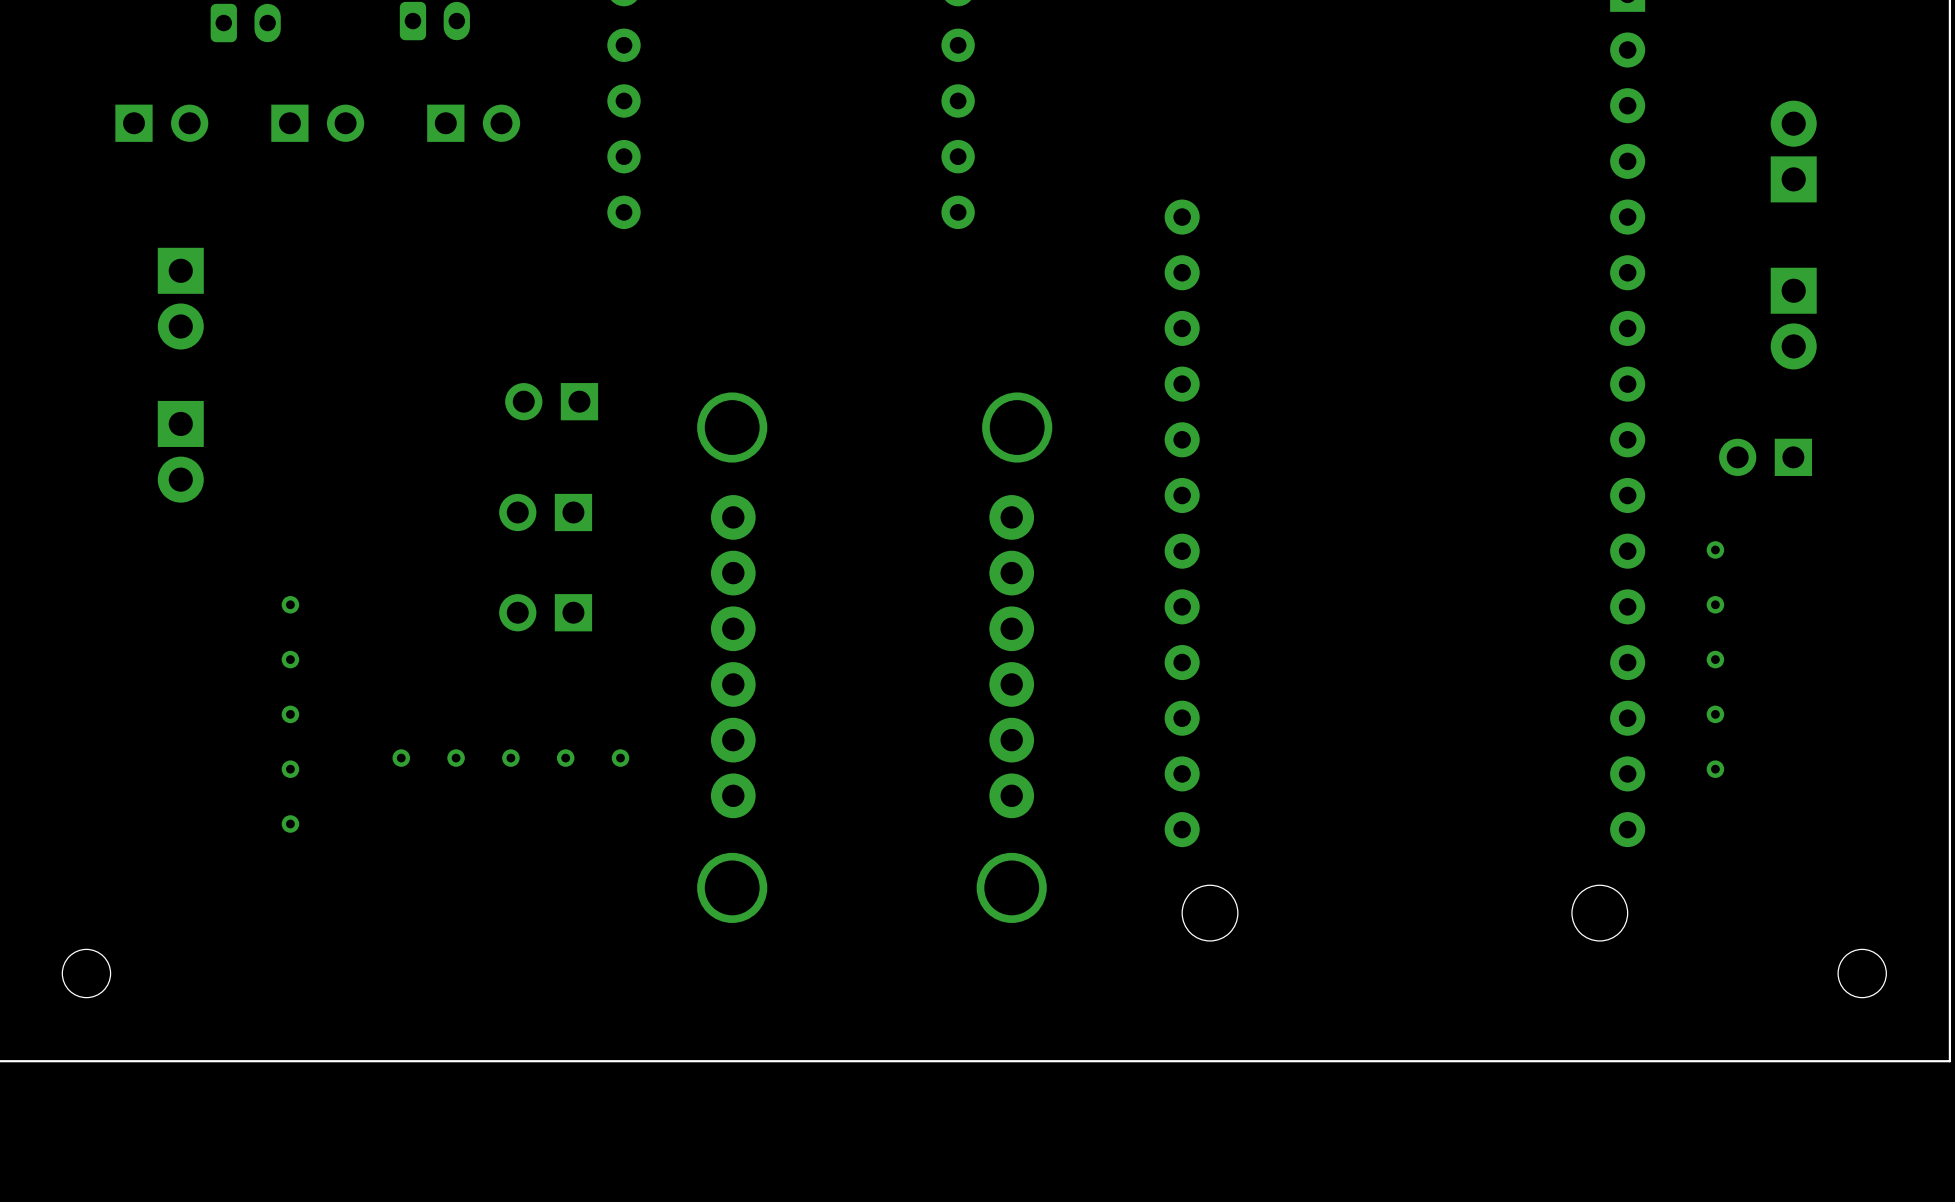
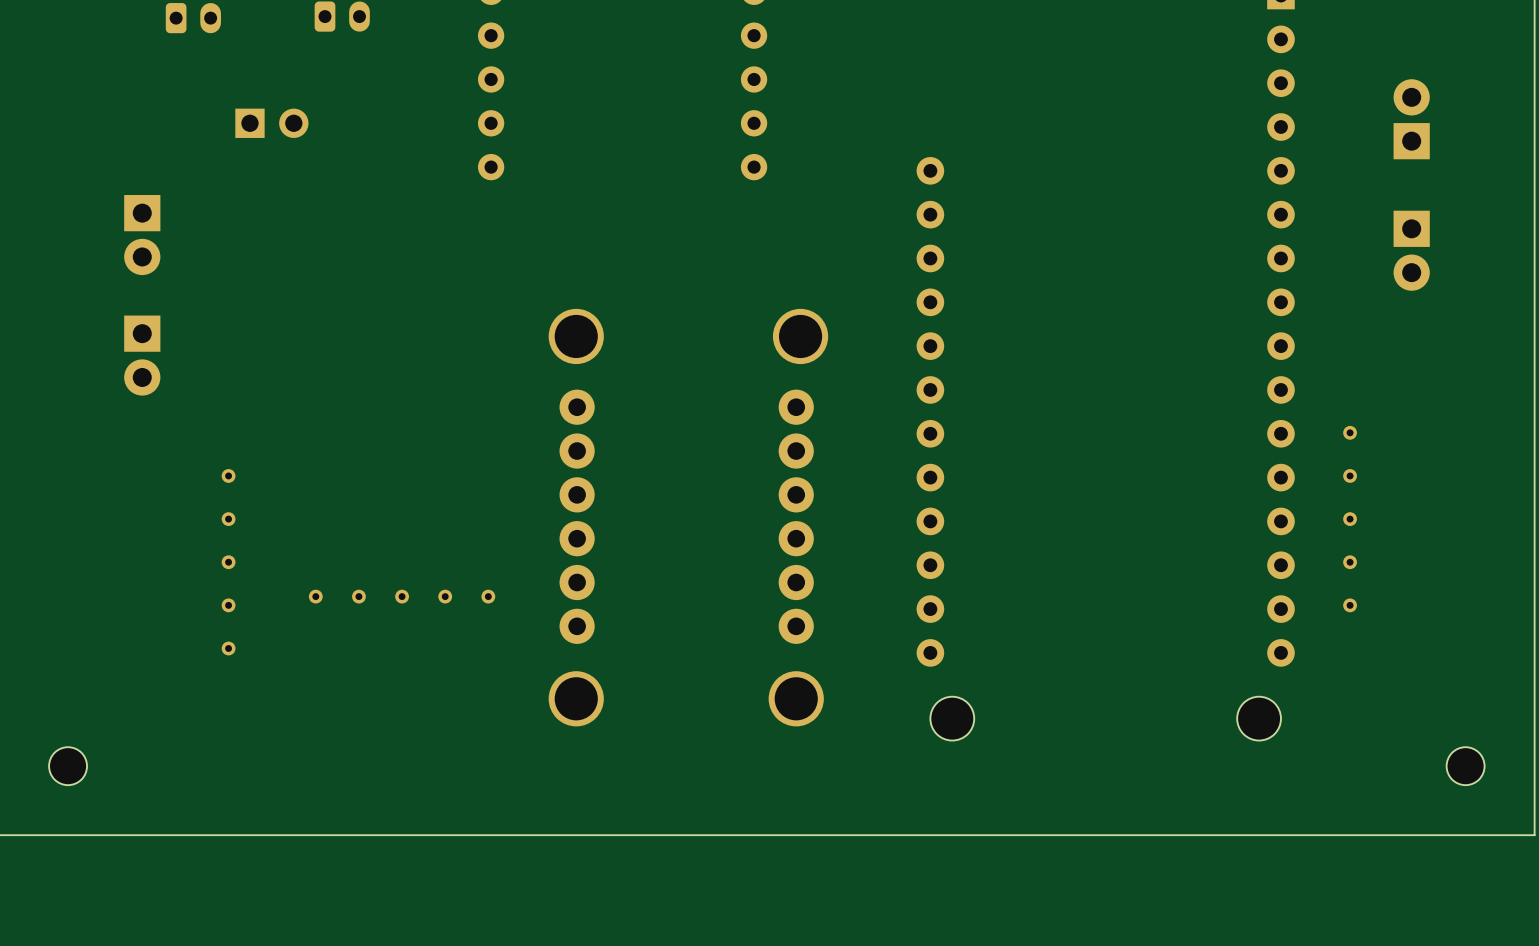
part: (161, 123) -> none
part position: (317, 123) -> (271, 123)
part: (473, 123) -> none
part: (551, 401) -> none
part: (1765, 457) -> none
part: (545, 512) -> none
part: (545, 612) -> none

